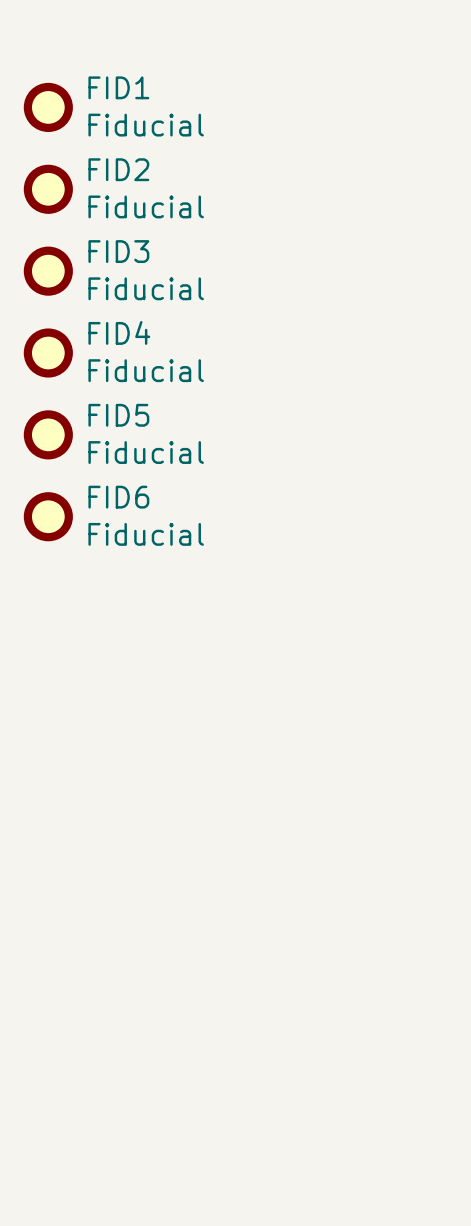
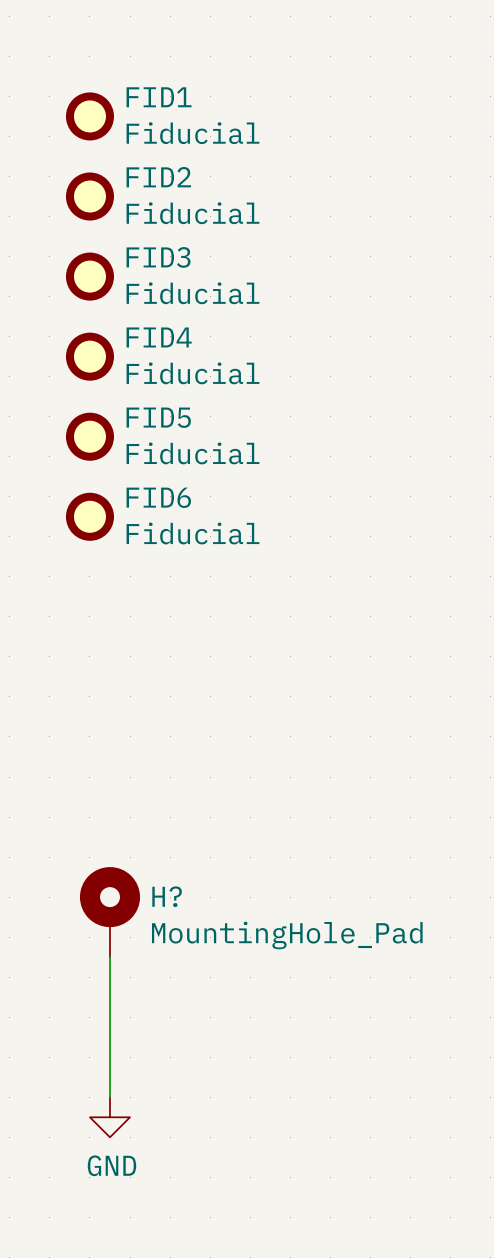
H?: none -> MountingHole_Pad (109, 912)
wire: none -> (109, 957) (109, 1097)
power symbol: none -> GND (109, 1117)

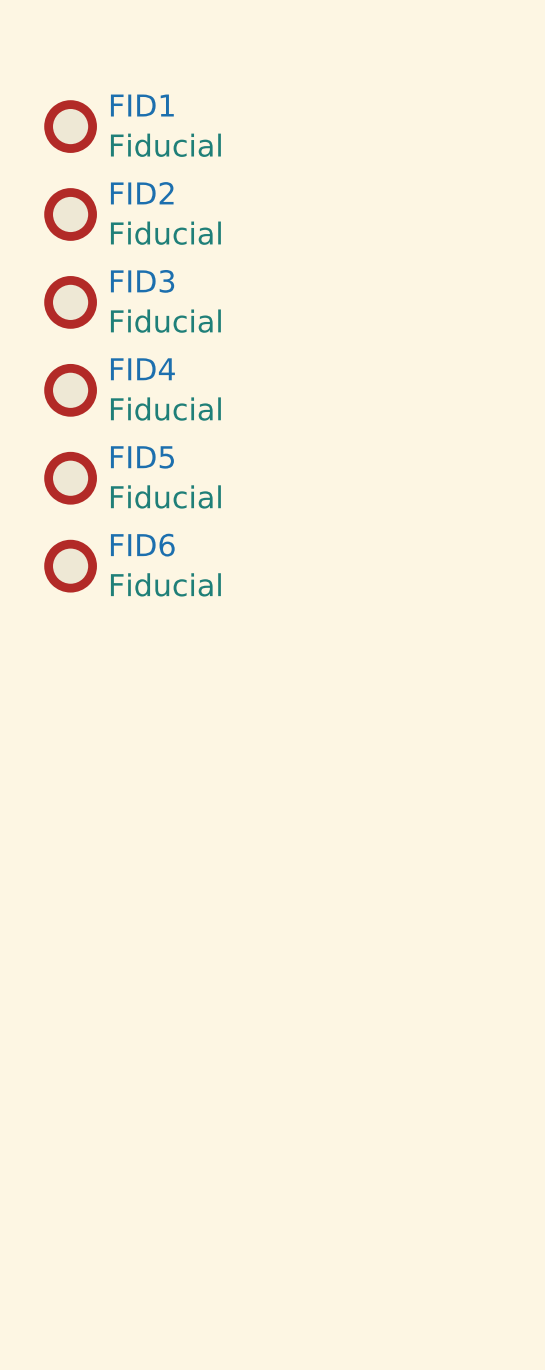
H?: MountingHole_Pad (109, 912) -> none
wire: (109, 957) (109, 1097) -> none
power symbol: GND (109, 1117) -> none

